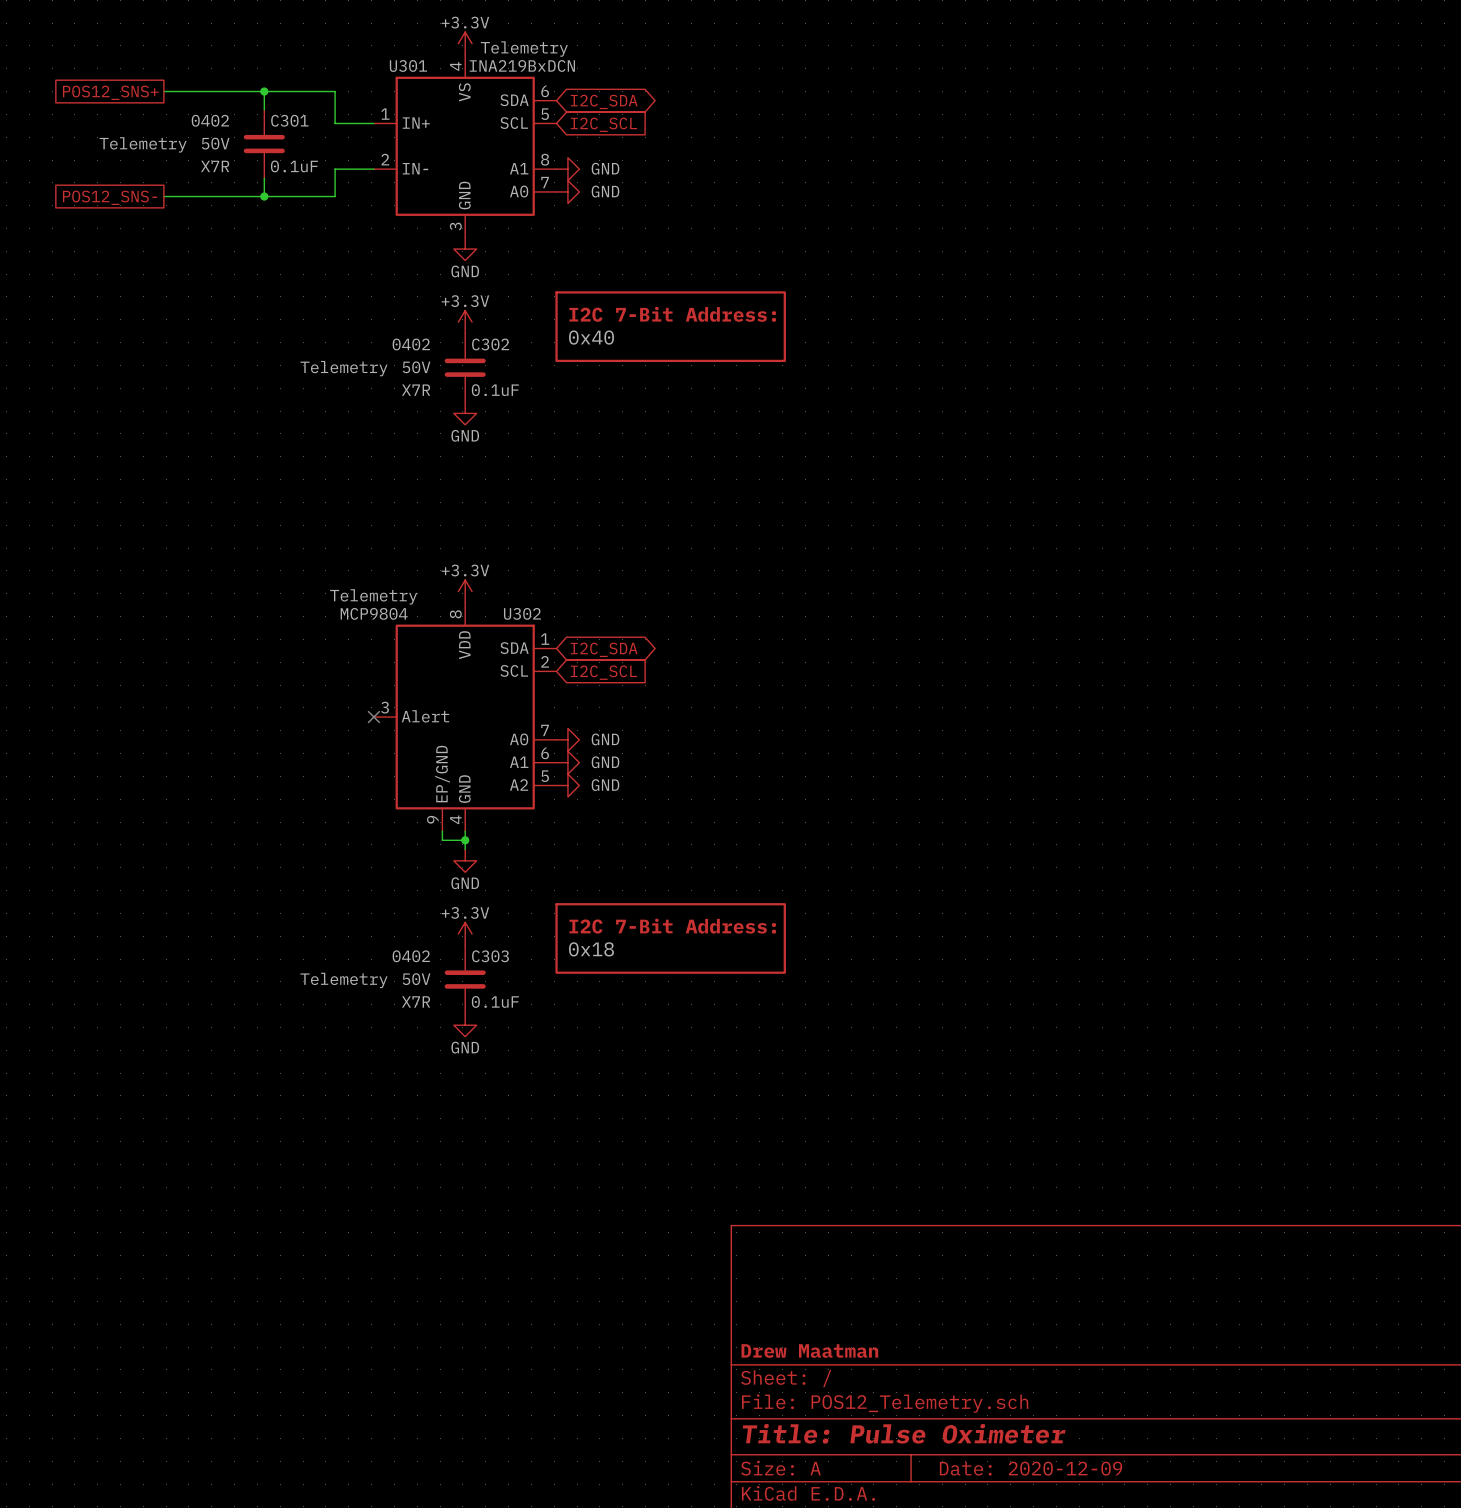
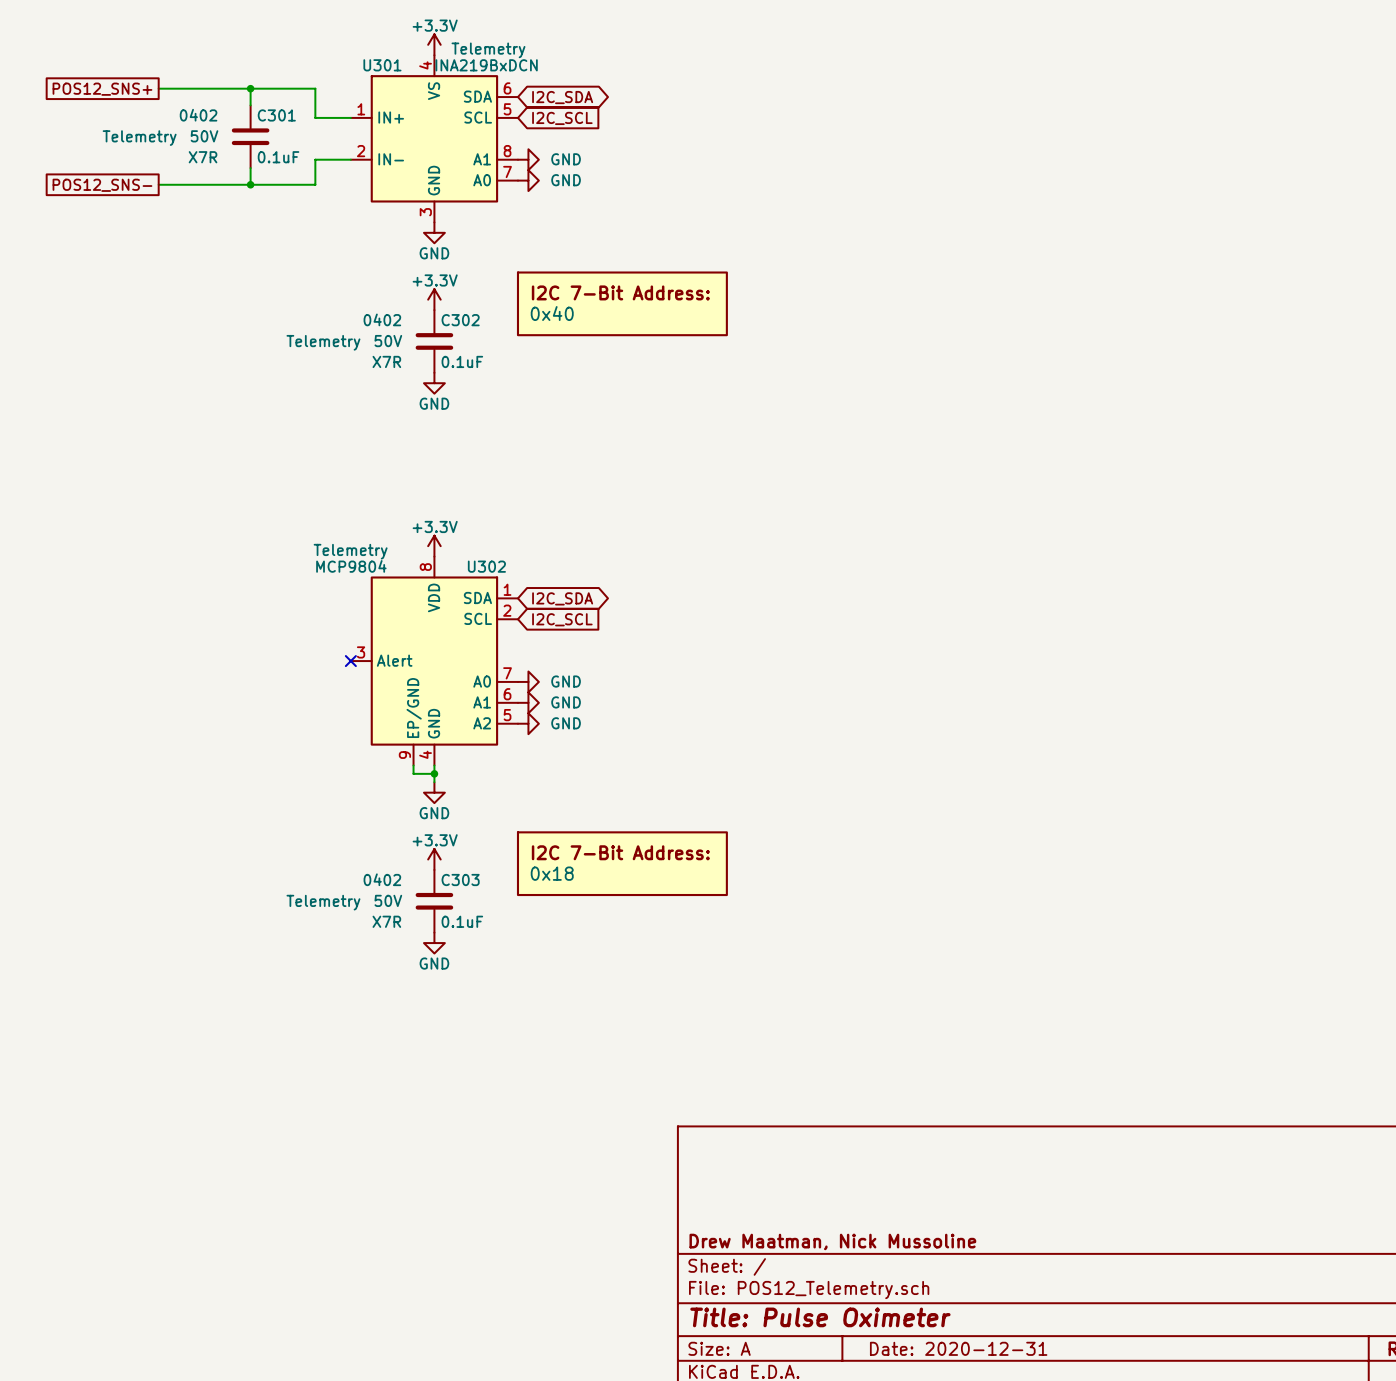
title block: Drew Maatman (809, 1351) -> Drew Maatman, Nick Mussoline (832, 1241)
title block: Date: 2020-12-09 (1031, 1468) -> Date: 2020-12-31 (958, 1348)

